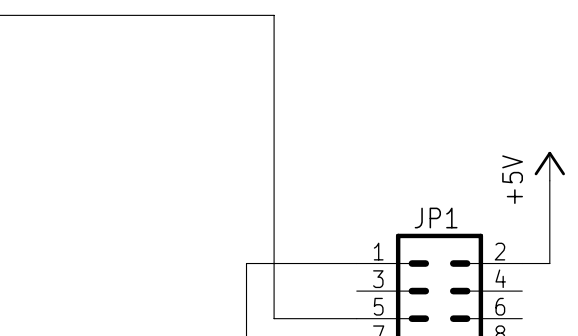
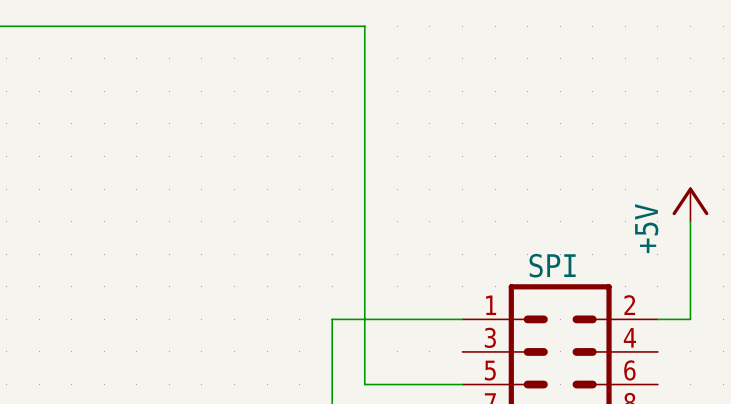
JP1 name: JP1 (436, 218) -> SPI (552, 265)

